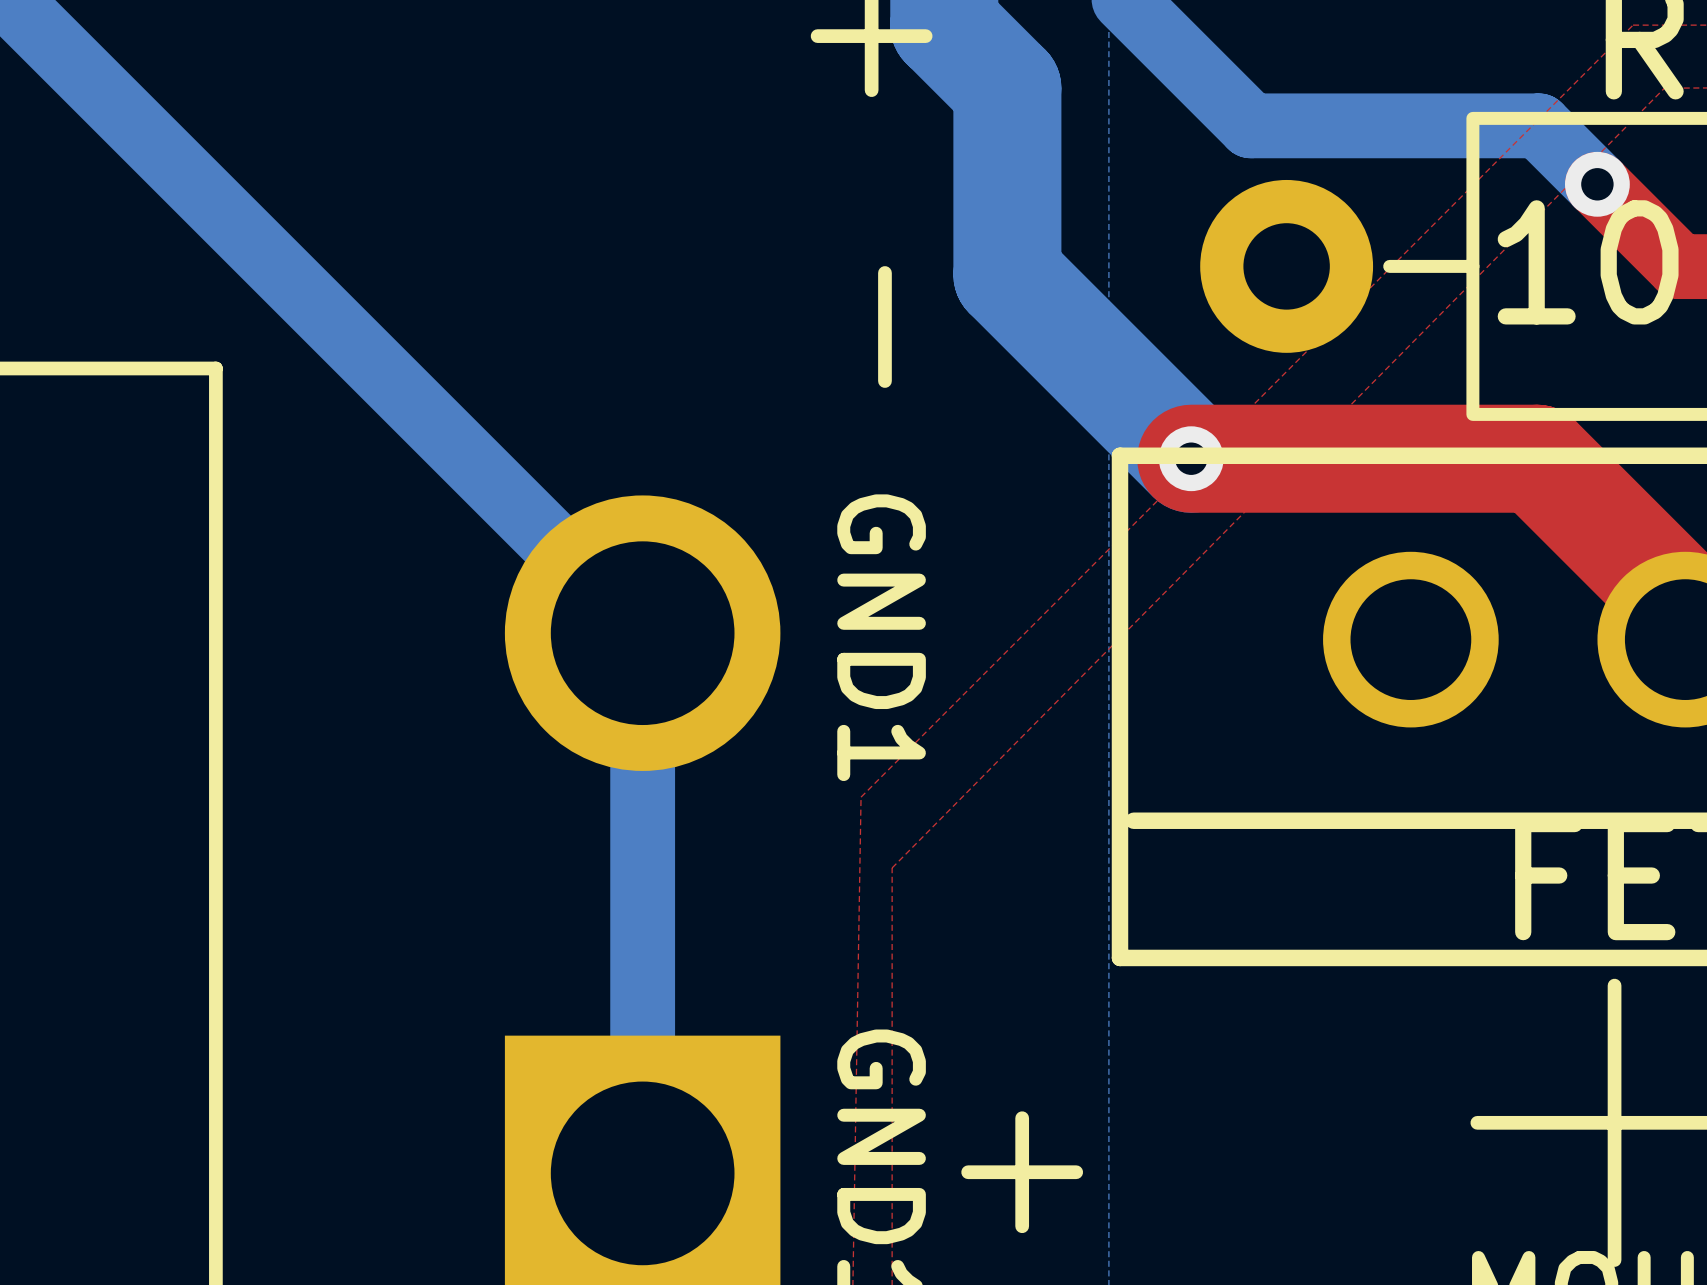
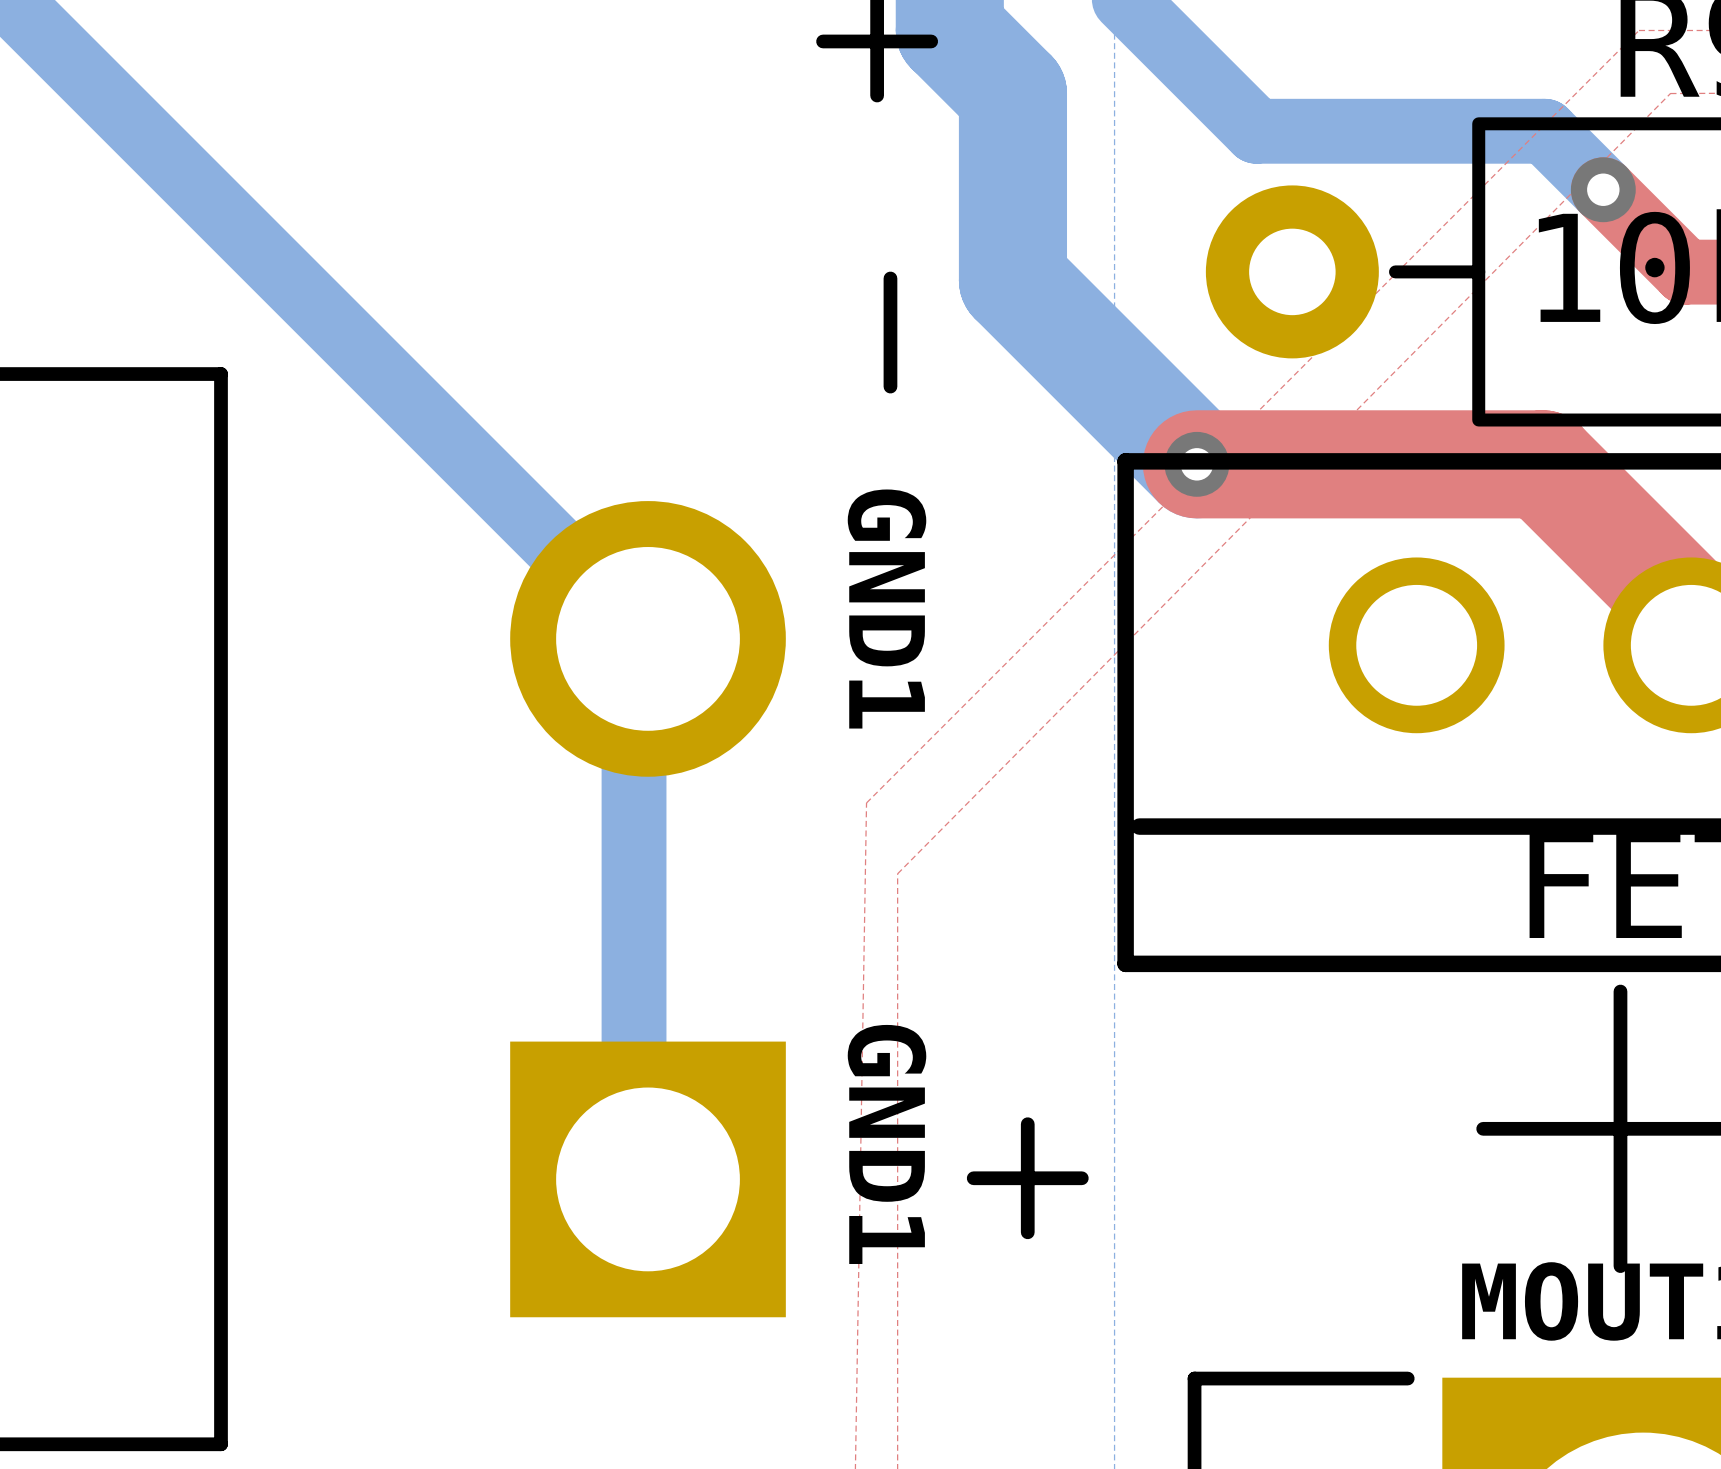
bottom track: (628, 619) (642, 633) (642, 1173) -> (634, 624) (634, 1179)

